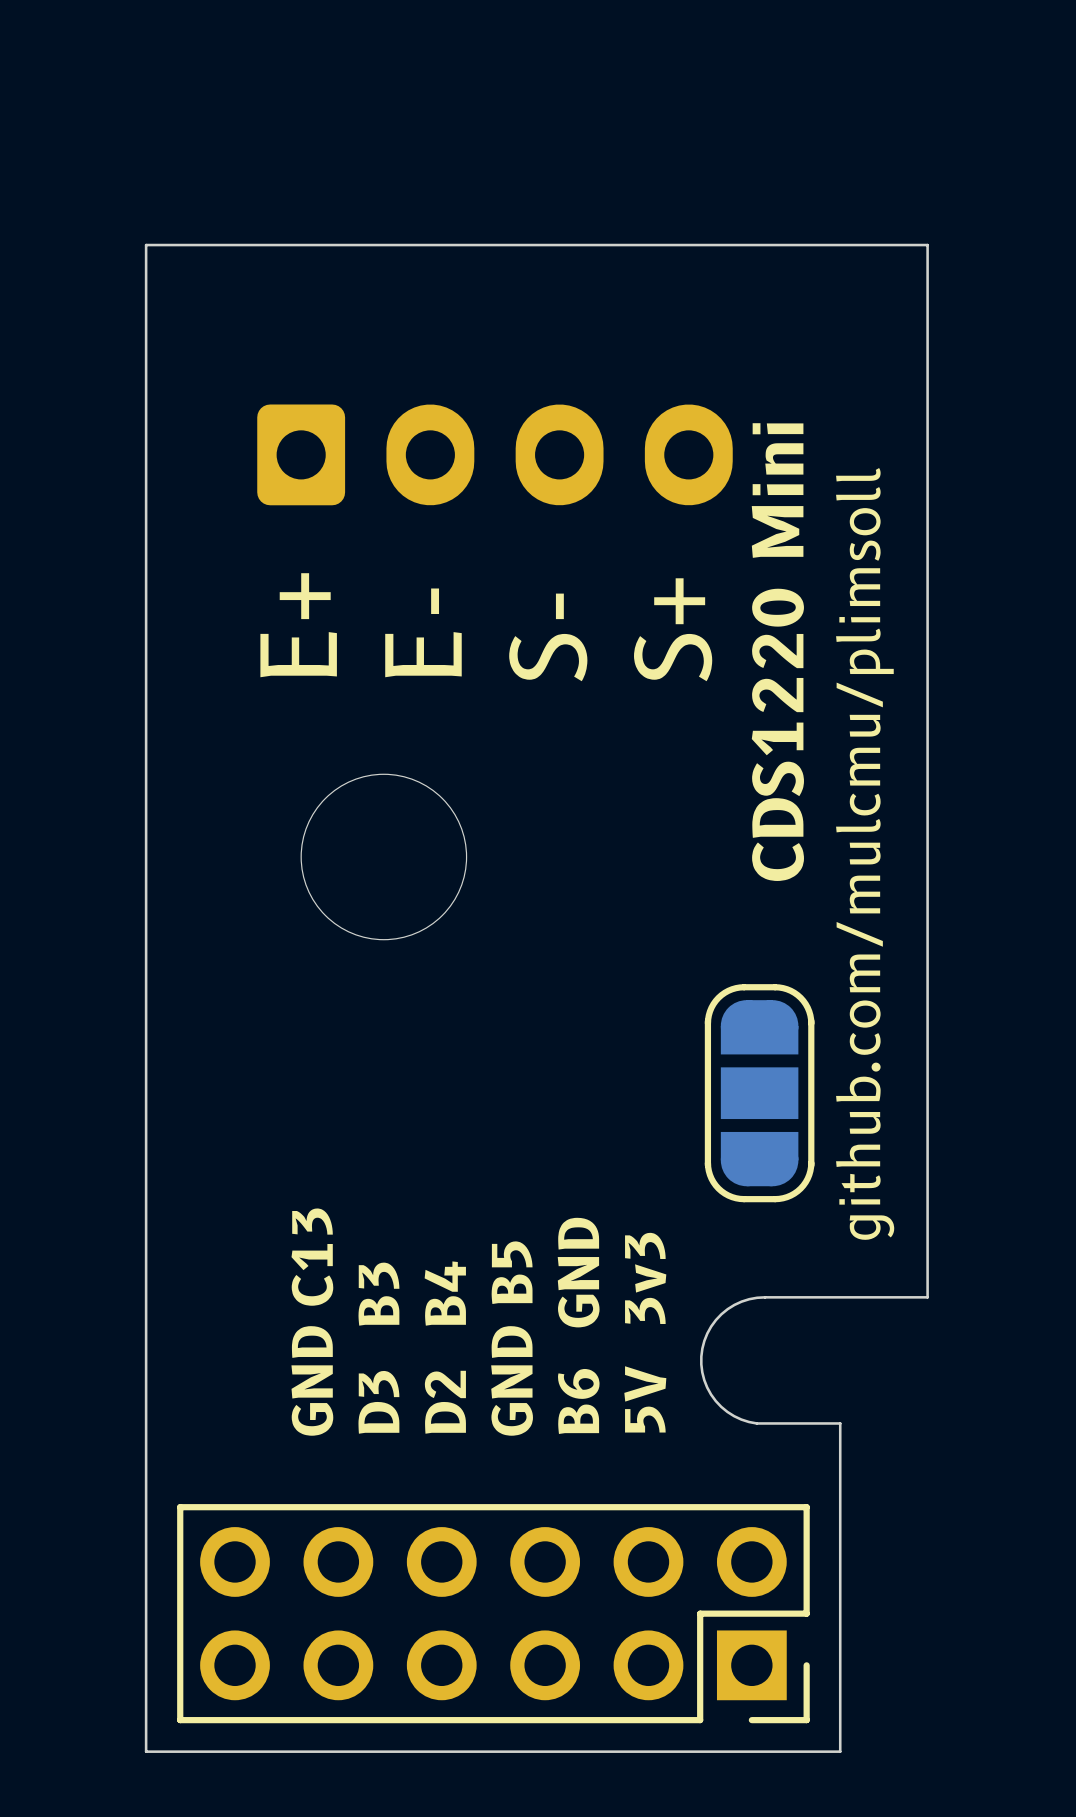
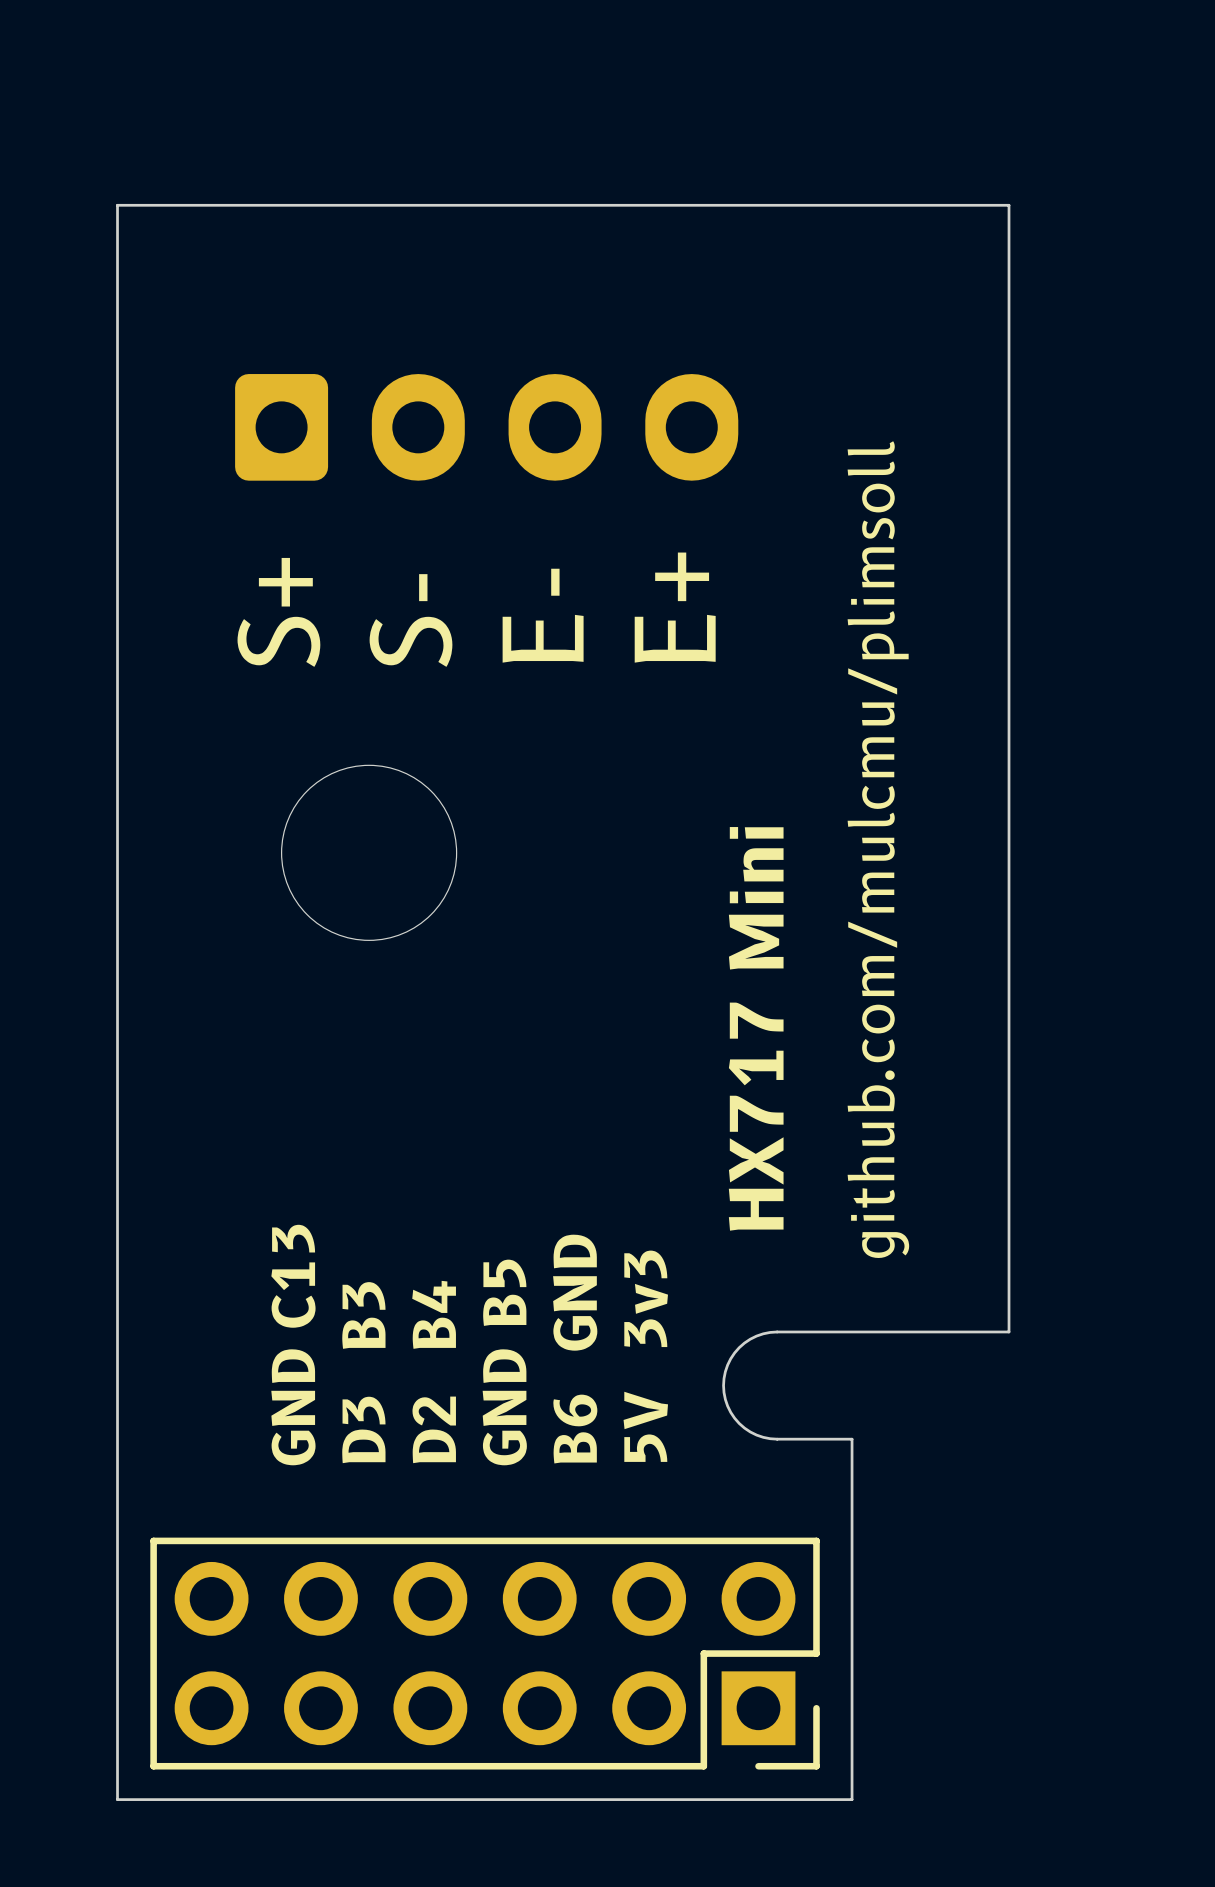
board edge: (927, 245) (927, 1297) (765, 1297) (749, 1299) (734, 1304) (715, 1320) (704, 1340) (701, 1356) (702, 1372) (707, 1387) (721, 1406) (734, 1416) (756, 1423) (840, 1423) -> (944, 205) (1009, 205) (1009, 1331) (777, 1331) (756, 1336) (739, 1347) (727, 1365) (723, 1385) (727, 1406) (739, 1423) (756, 1435) (770, 1438) (852, 1439) (852, 1452)
text: E+ (298, 625) -> S+ (278, 612)
text: S+ (673, 629) -> E+ (675, 607)
text: E- (423, 632) -> S- (411, 620)
text: S- (548, 637) -> E- (543, 615)
text: CDS1220 Mini (777, 652) -> none
text: none -> HX717 Mini (756, 1028)
part: (759, 1093) -> none

